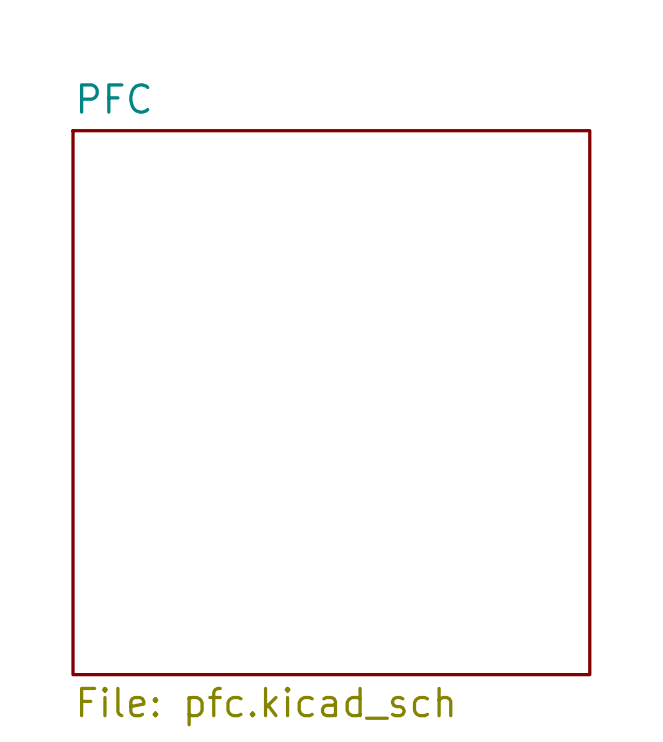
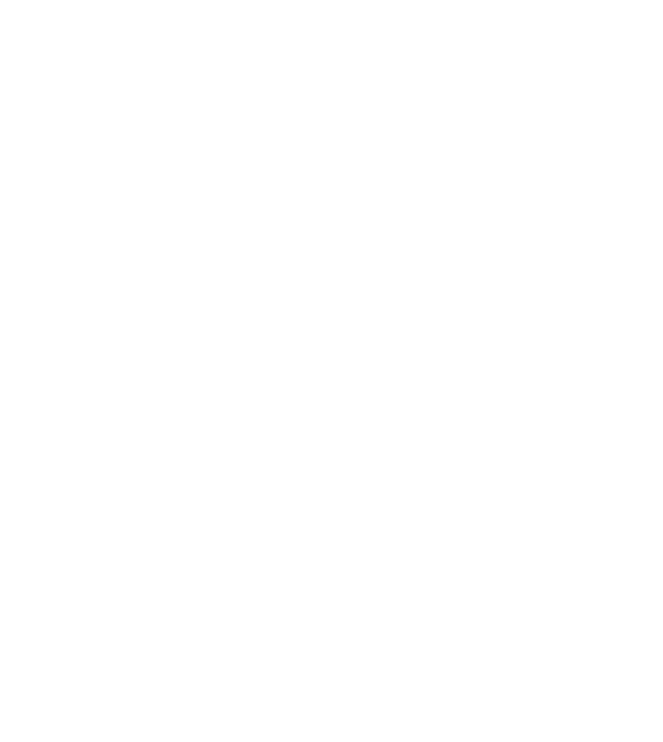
sheet PFC: File: pfc.kicad_sch (331, 402) -> none

